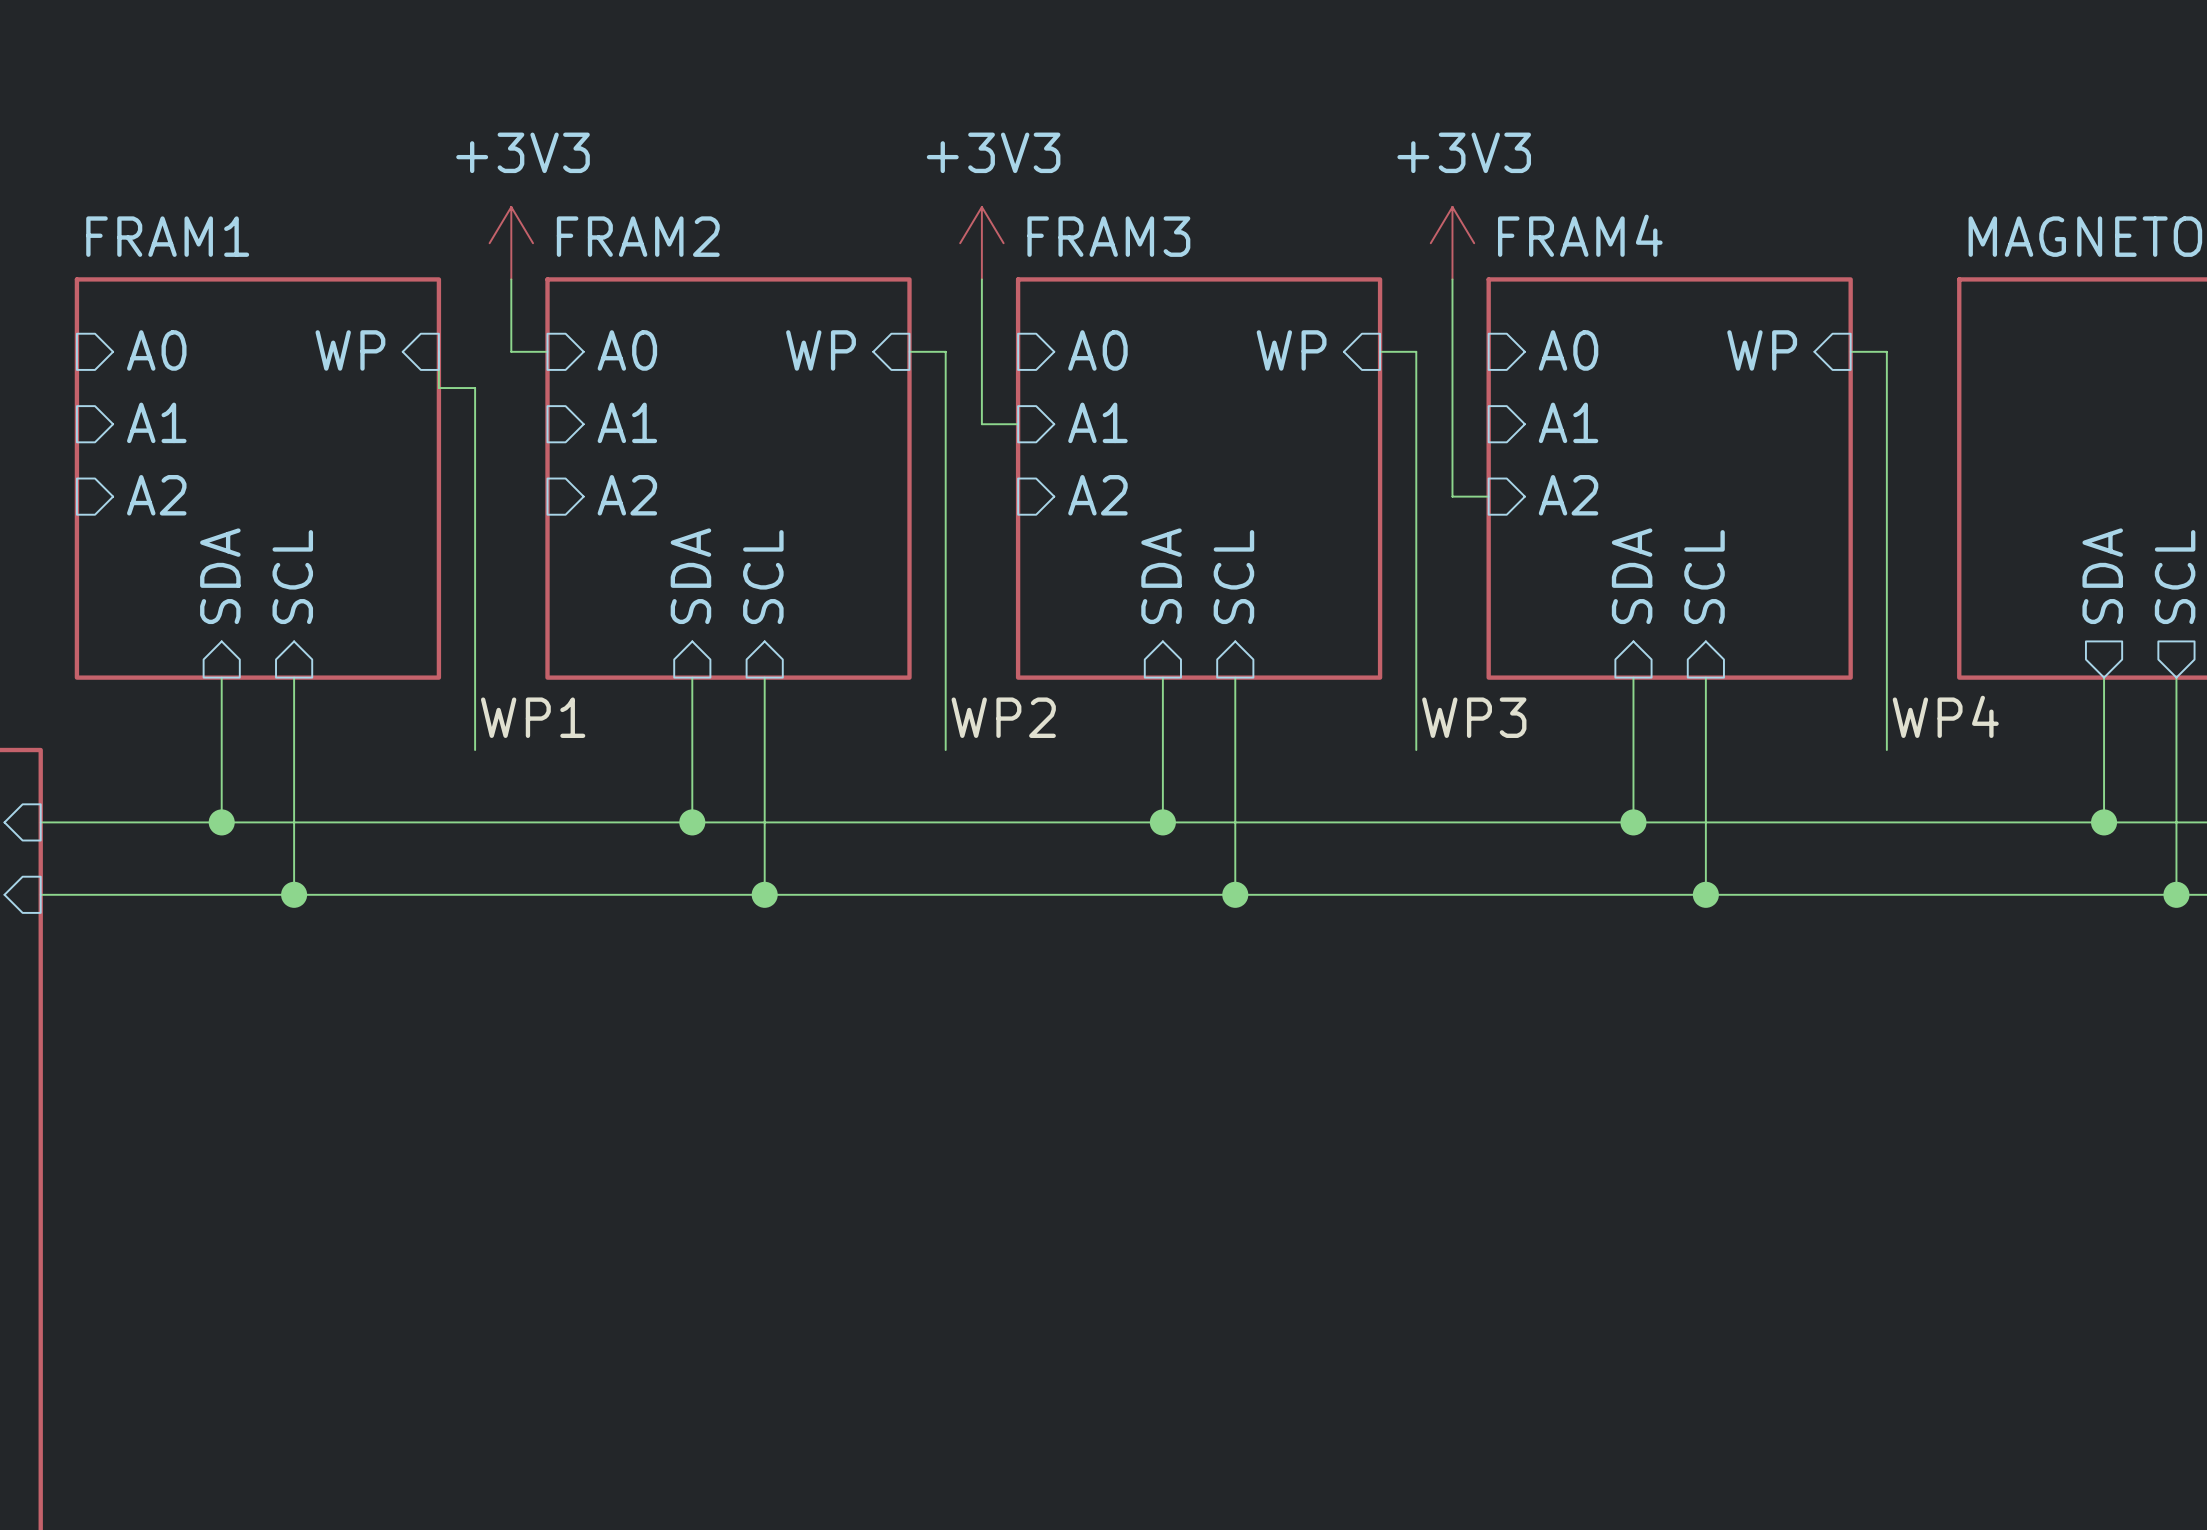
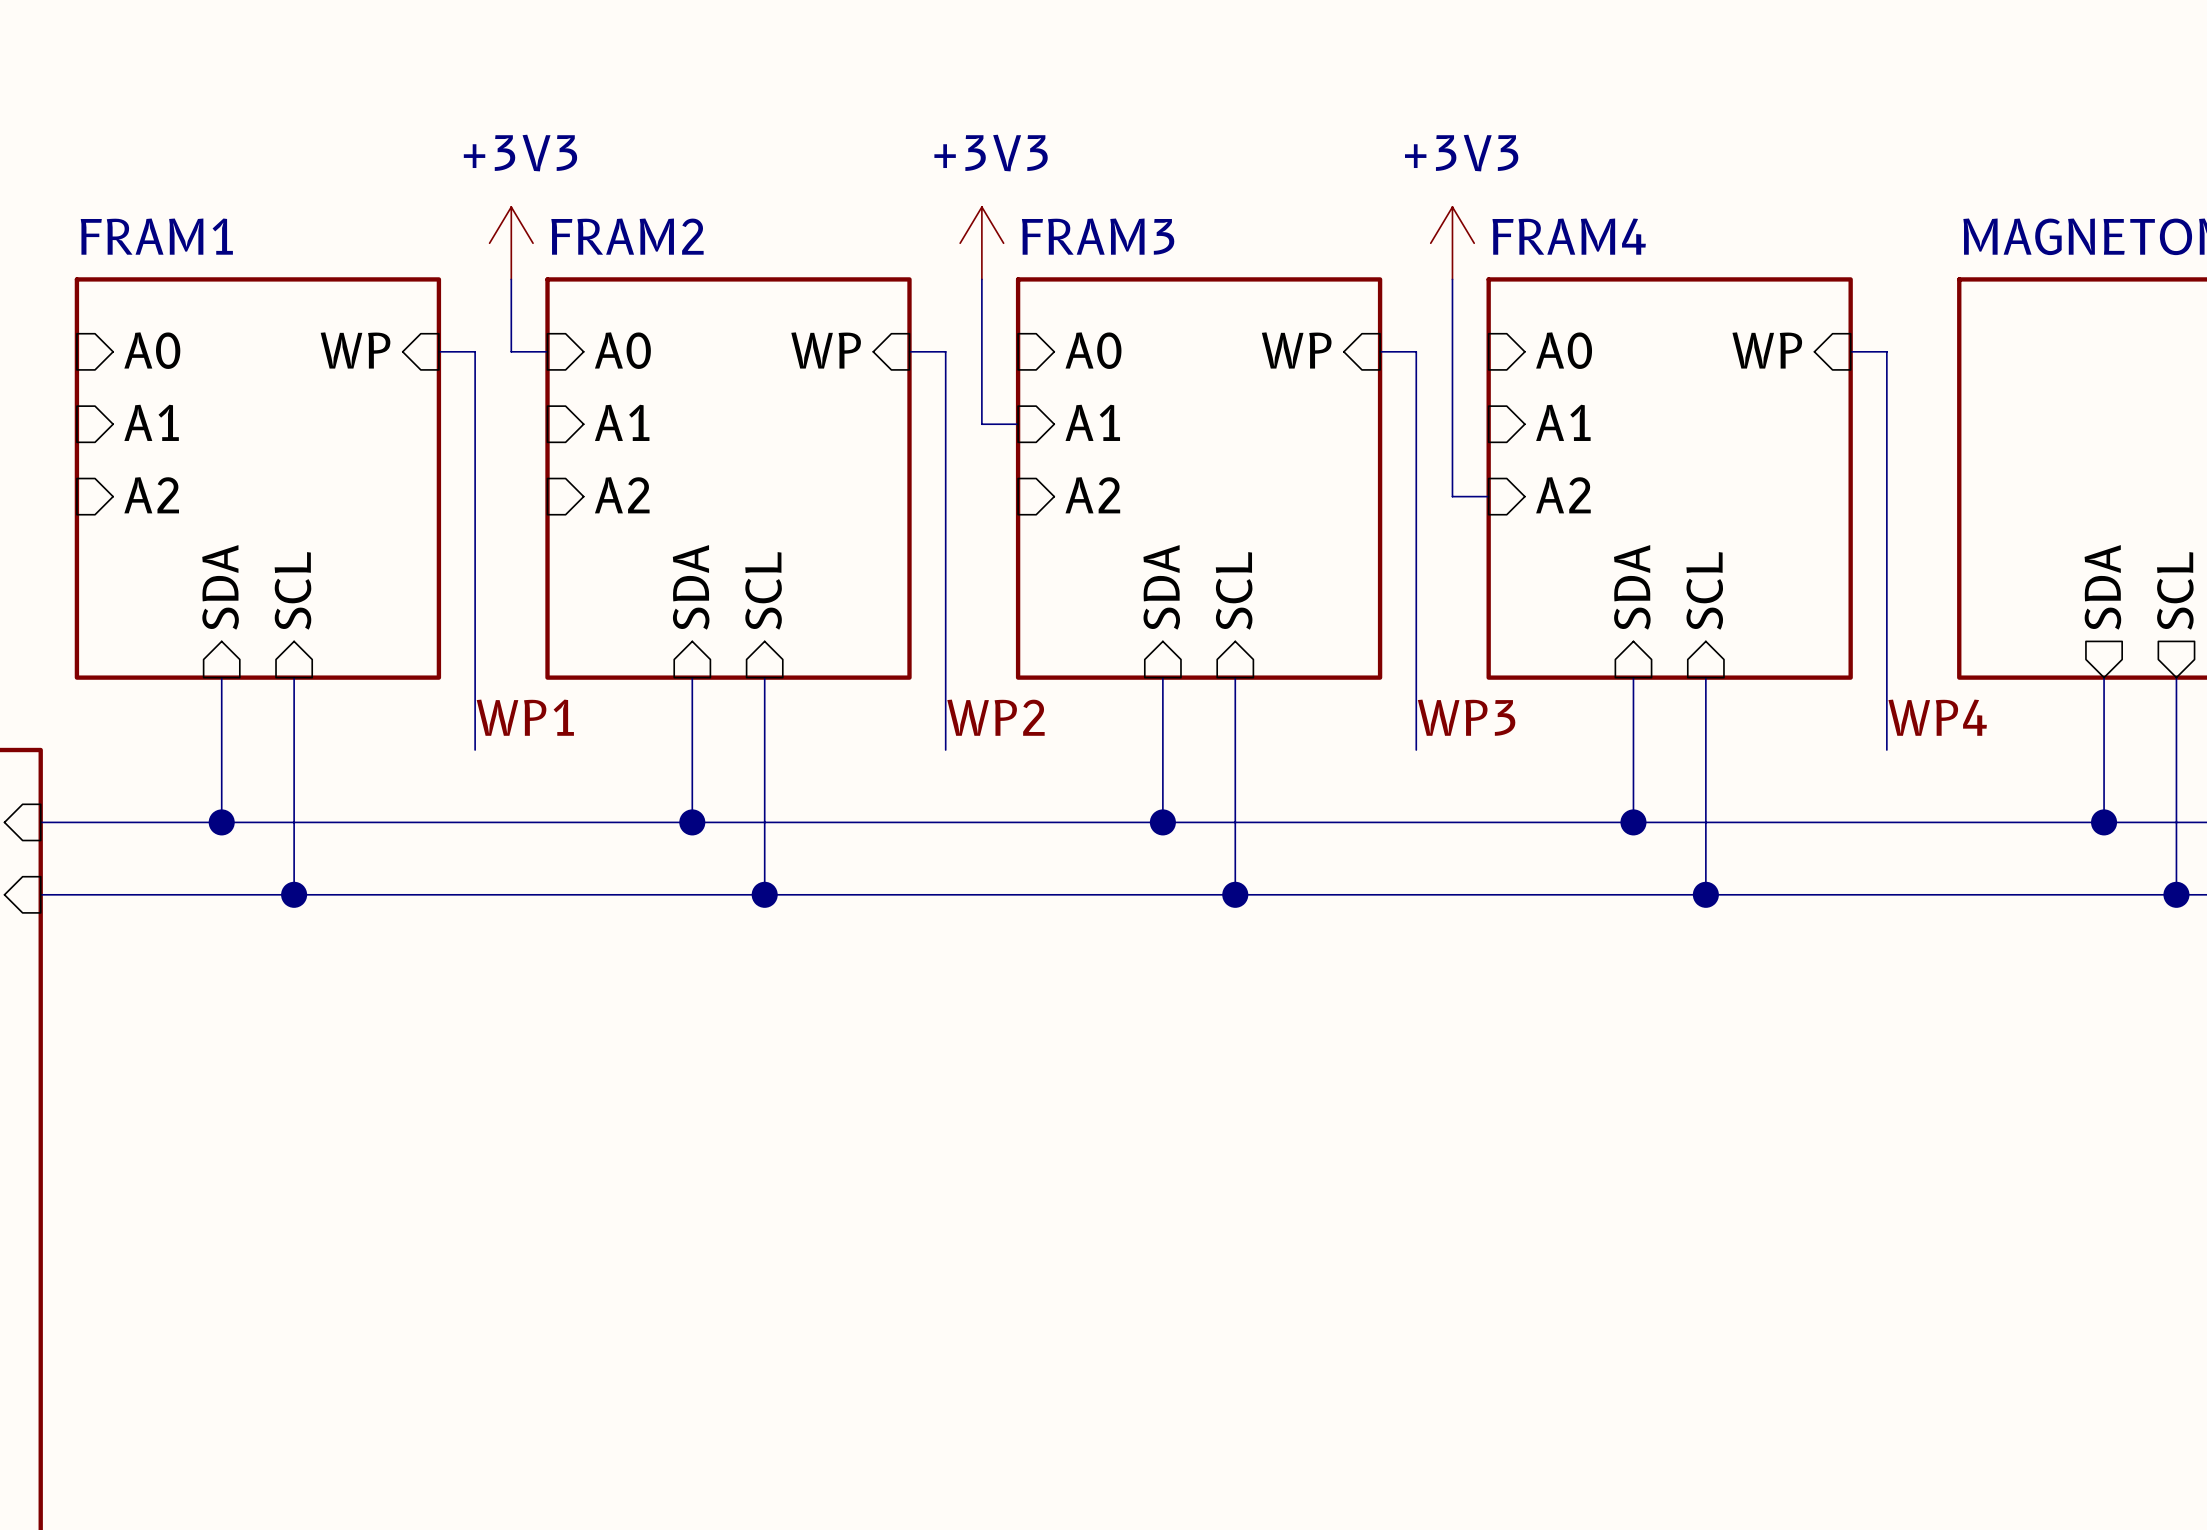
wire: (438, 351) (438, 388) (475, 388) -> (438, 351) (475, 351) (475, 388)

